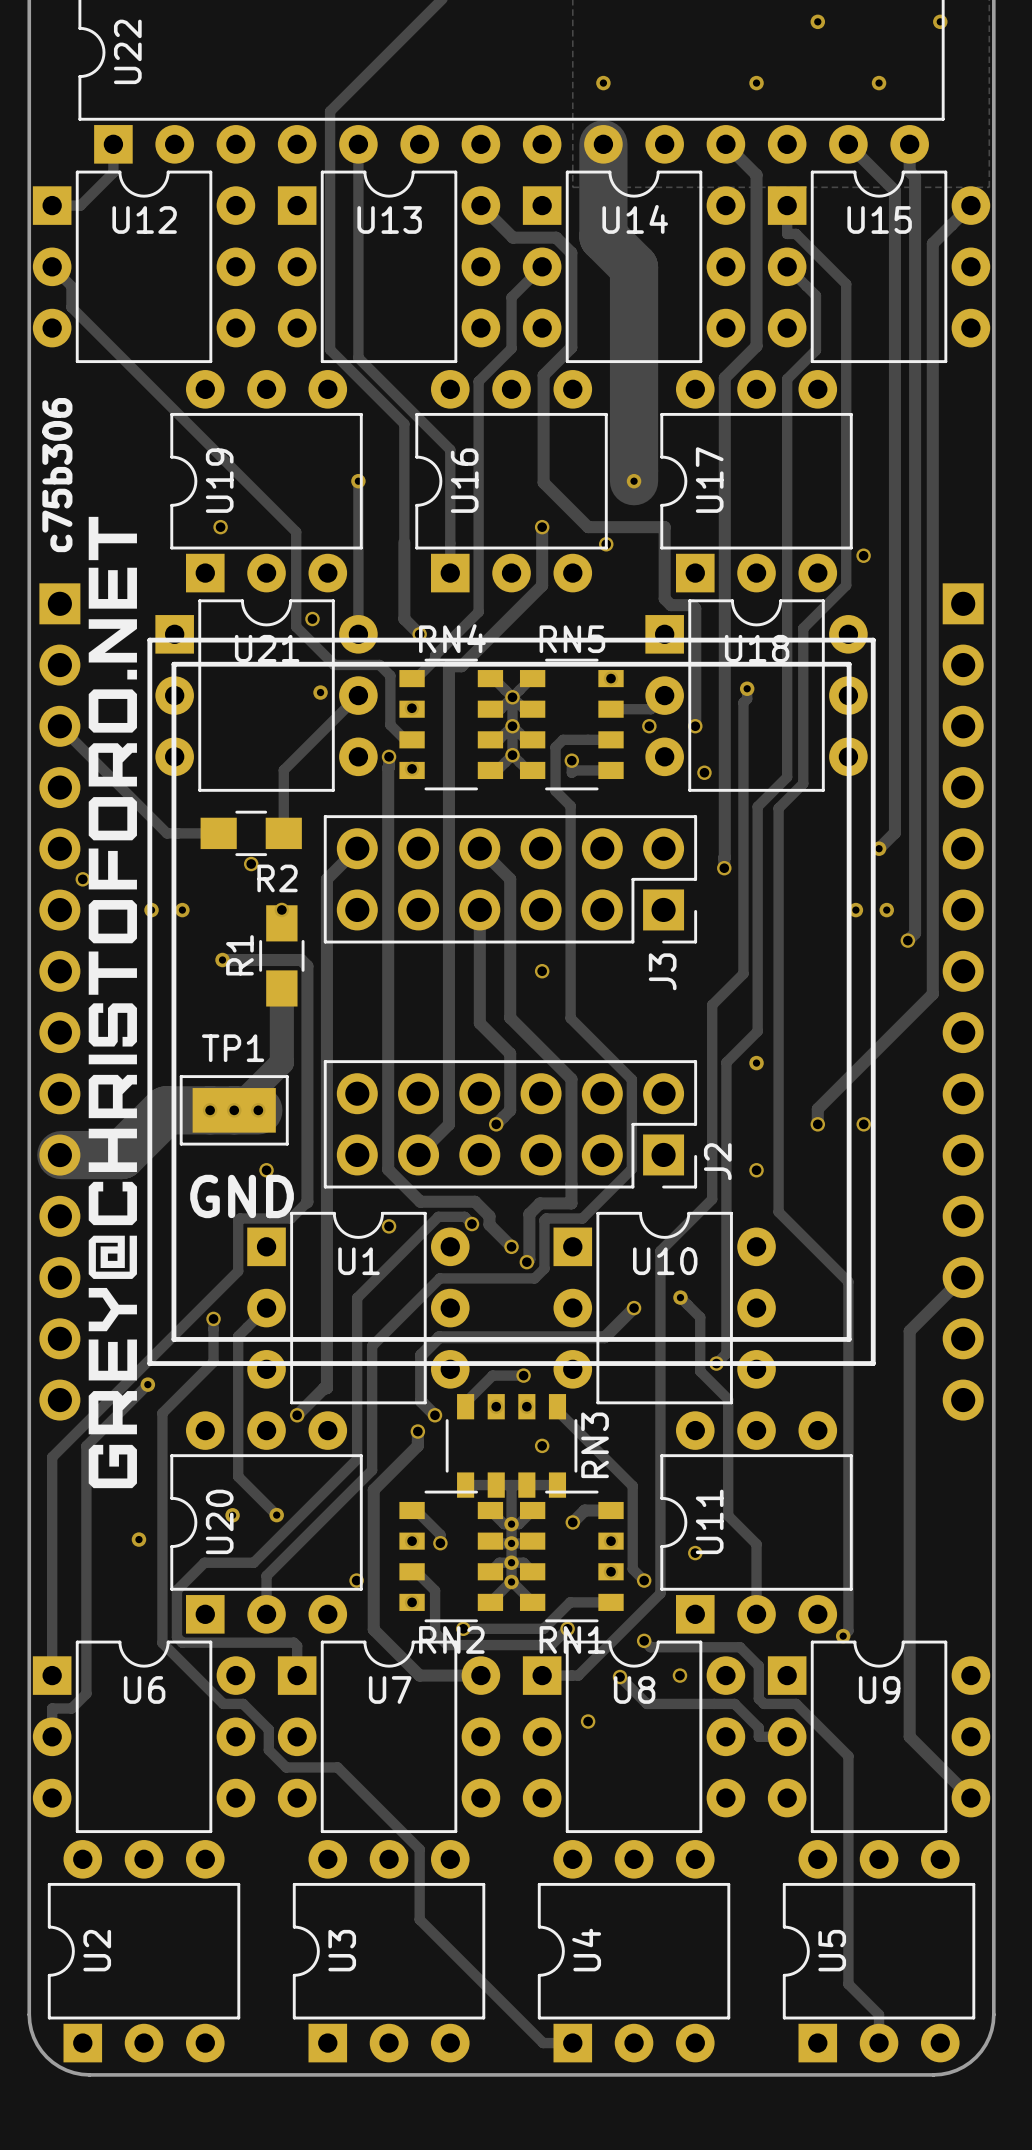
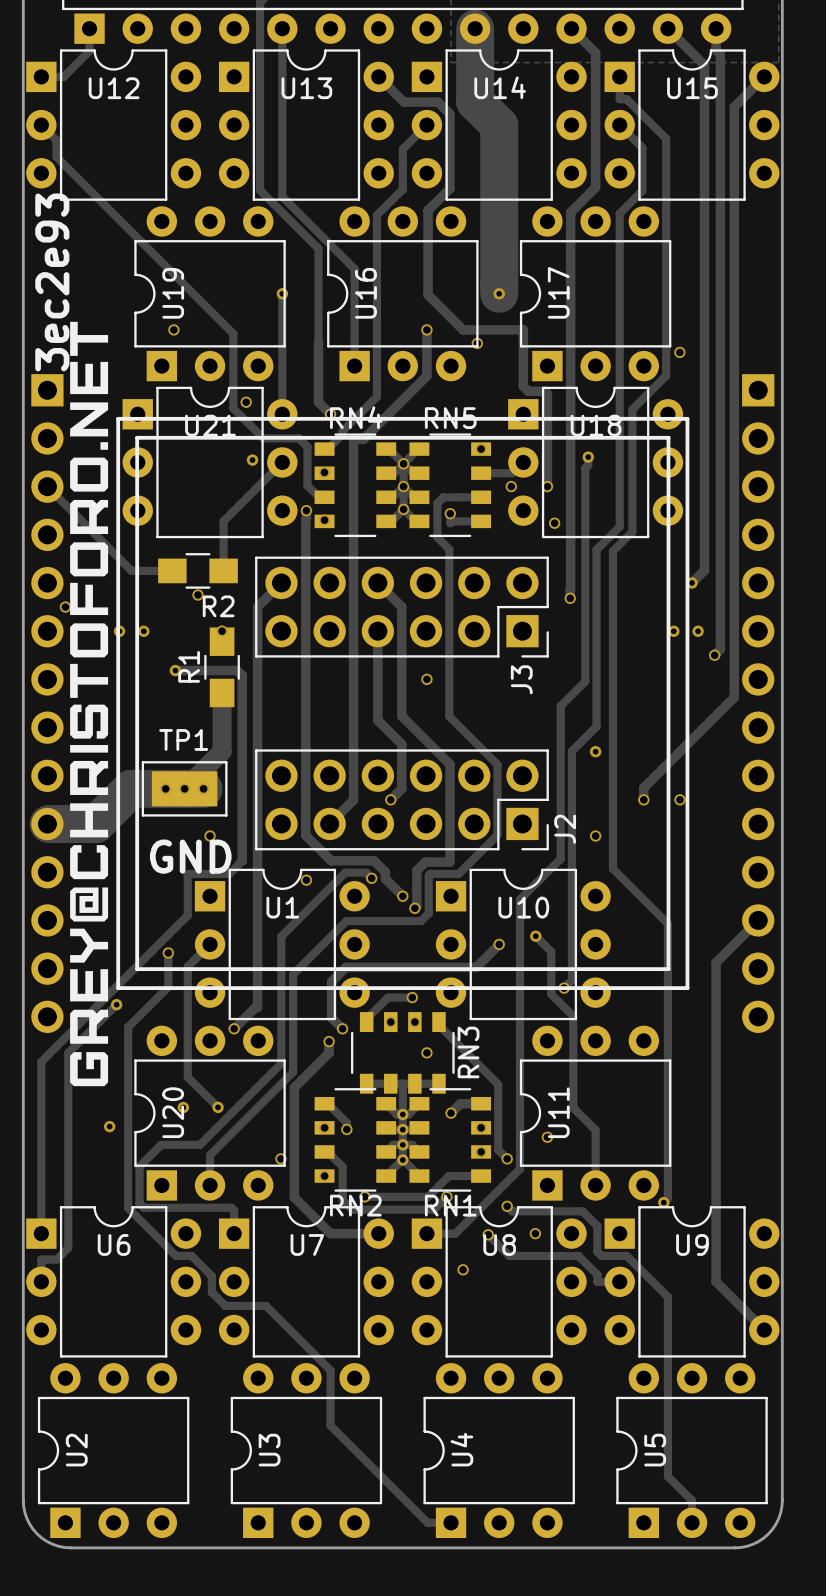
text: c75b306 (57, 475) -> 3ec2e93 (52, 282)

